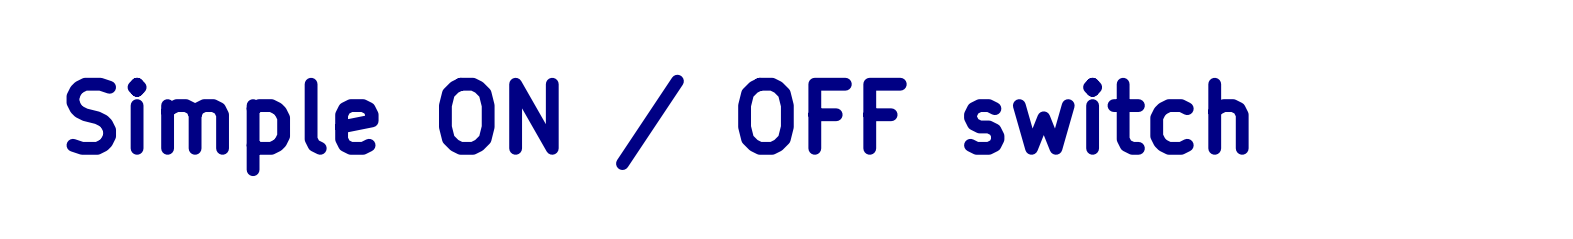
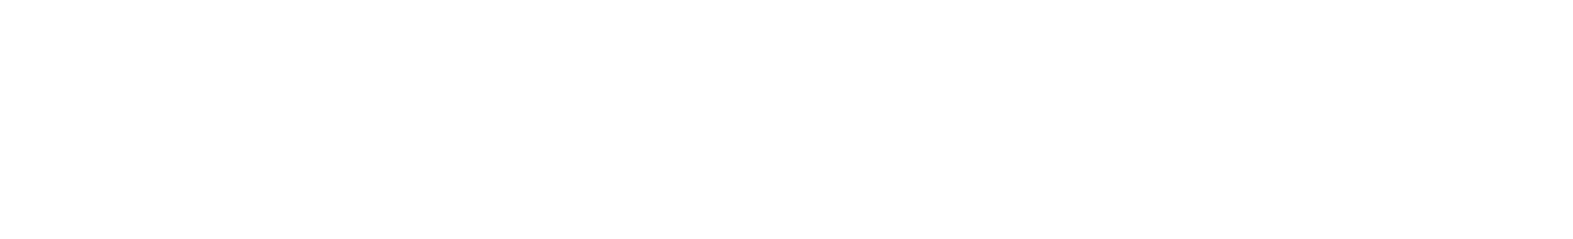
text: Simple ON / OFF switch (657, 125) -> none

